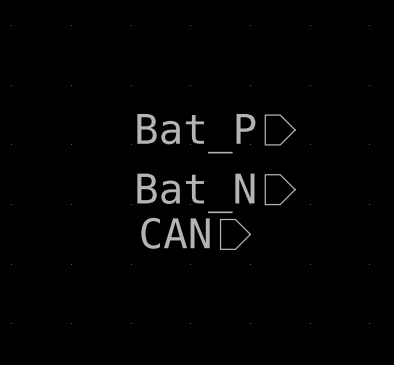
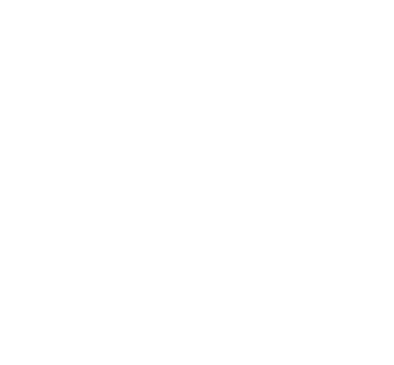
hierarchical label: Bat_P (196, 133) -> none
hierarchical label: Bat_N (195, 193) -> none
hierarchical label: CAN (175, 233) -> none

